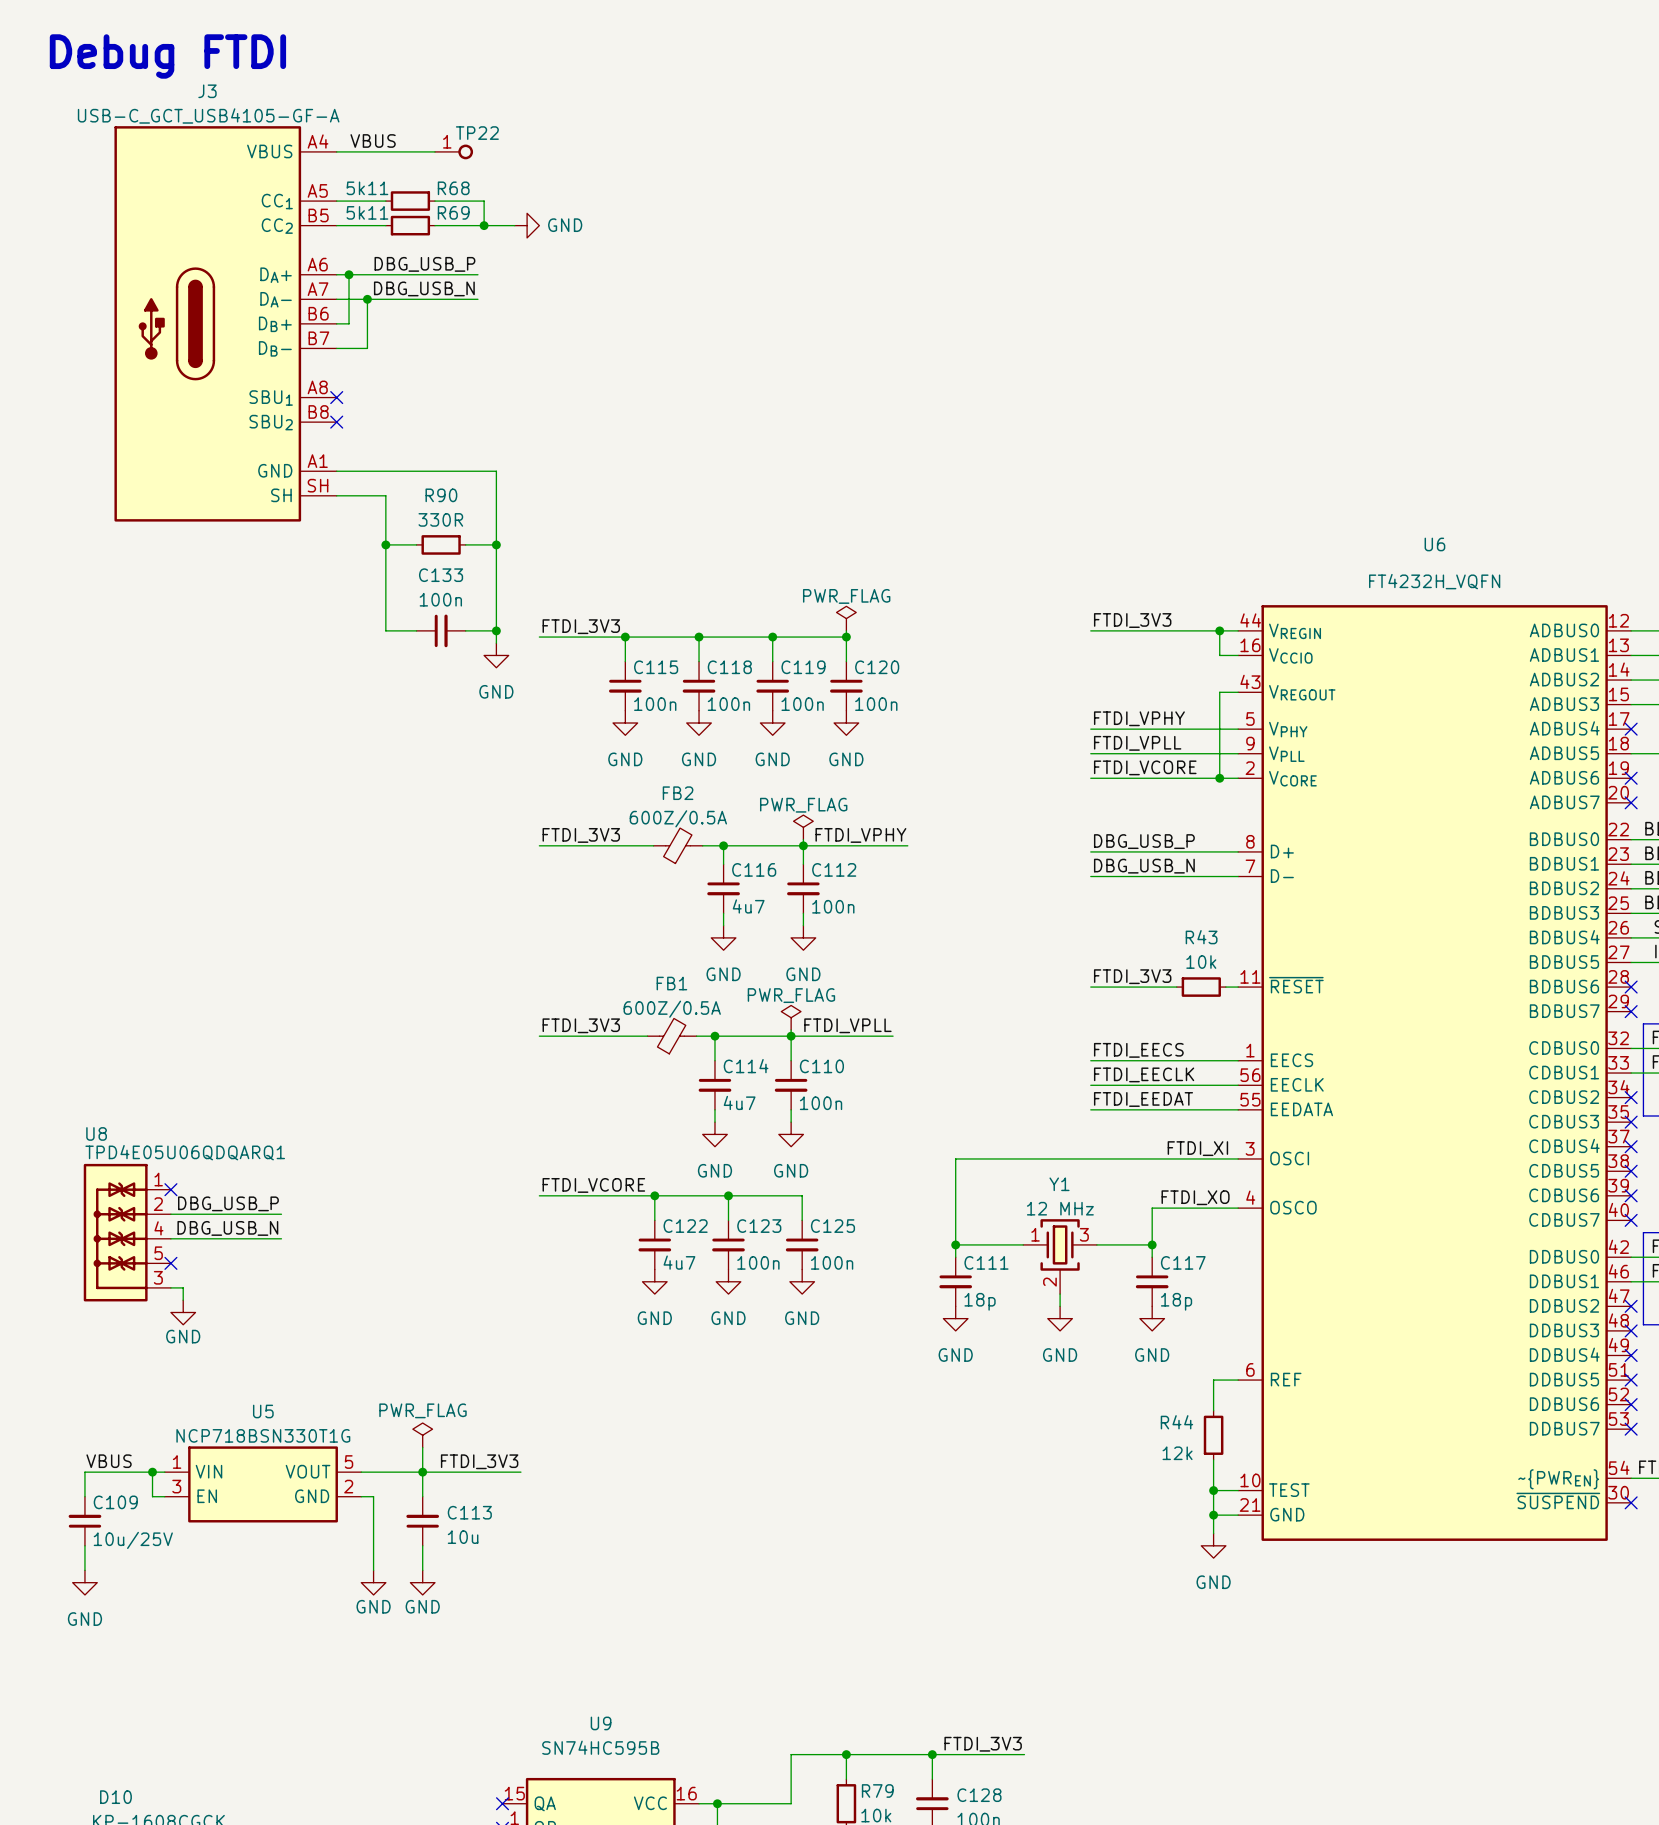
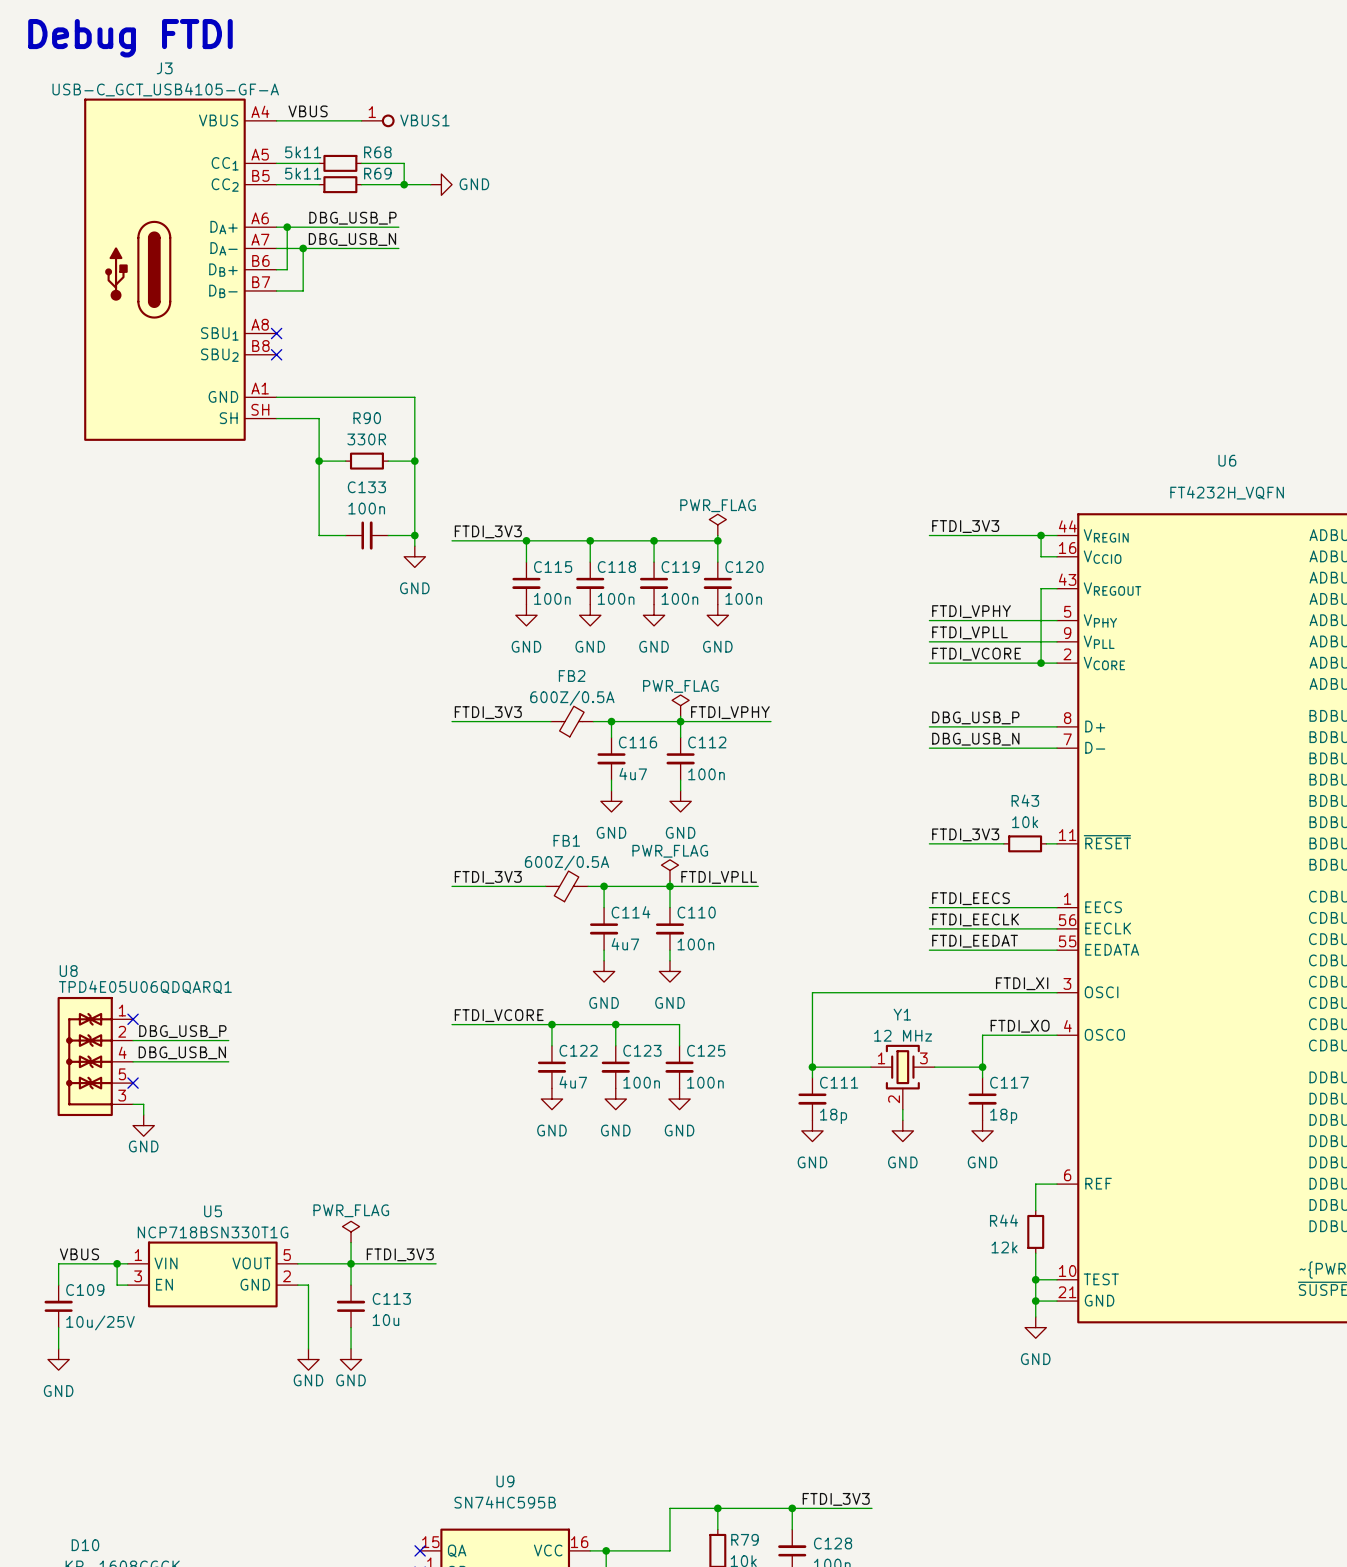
TP22 name: TP22 (477, 133) -> VBUS1 (424, 120)

